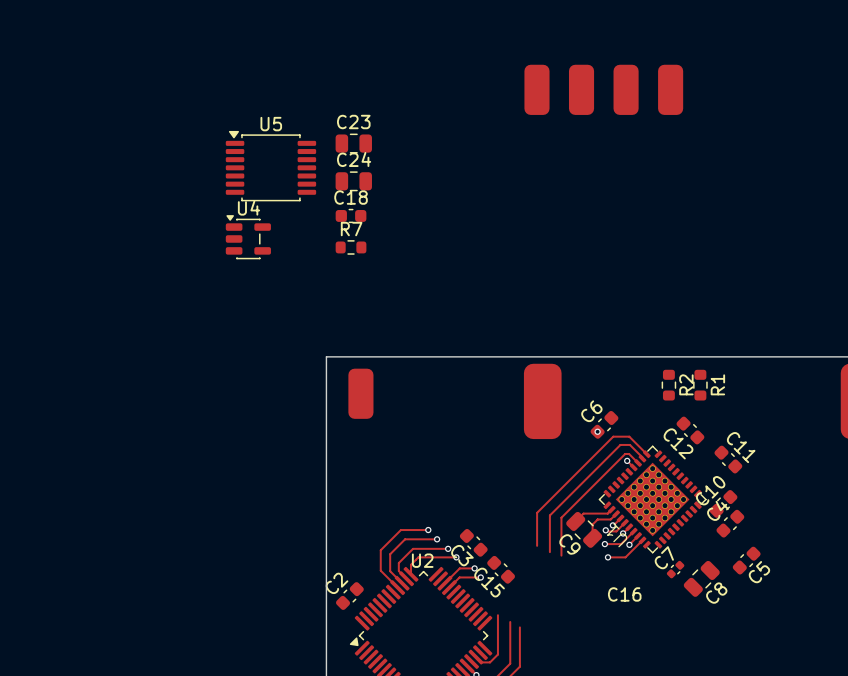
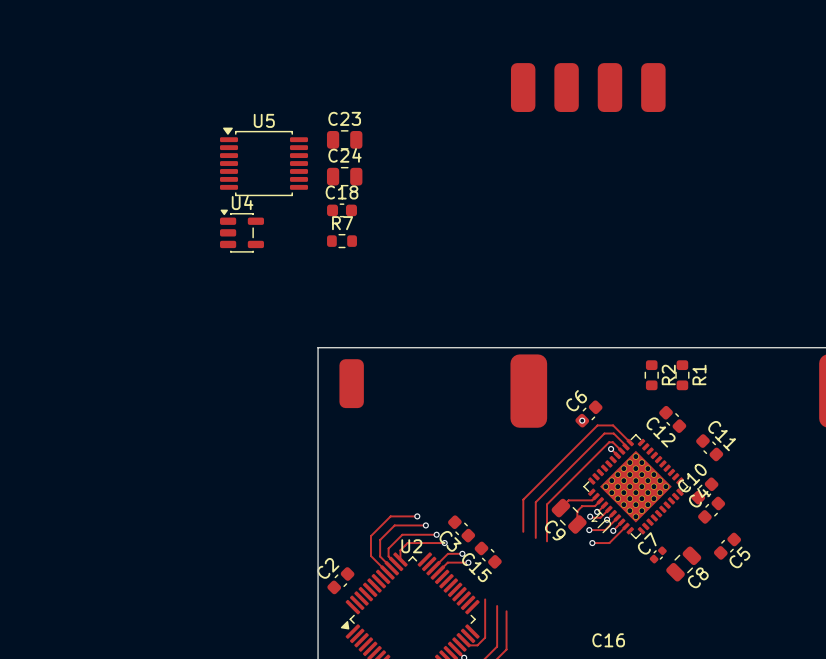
C16 name position: C16 (624, 594) -> C16 (608, 640)

